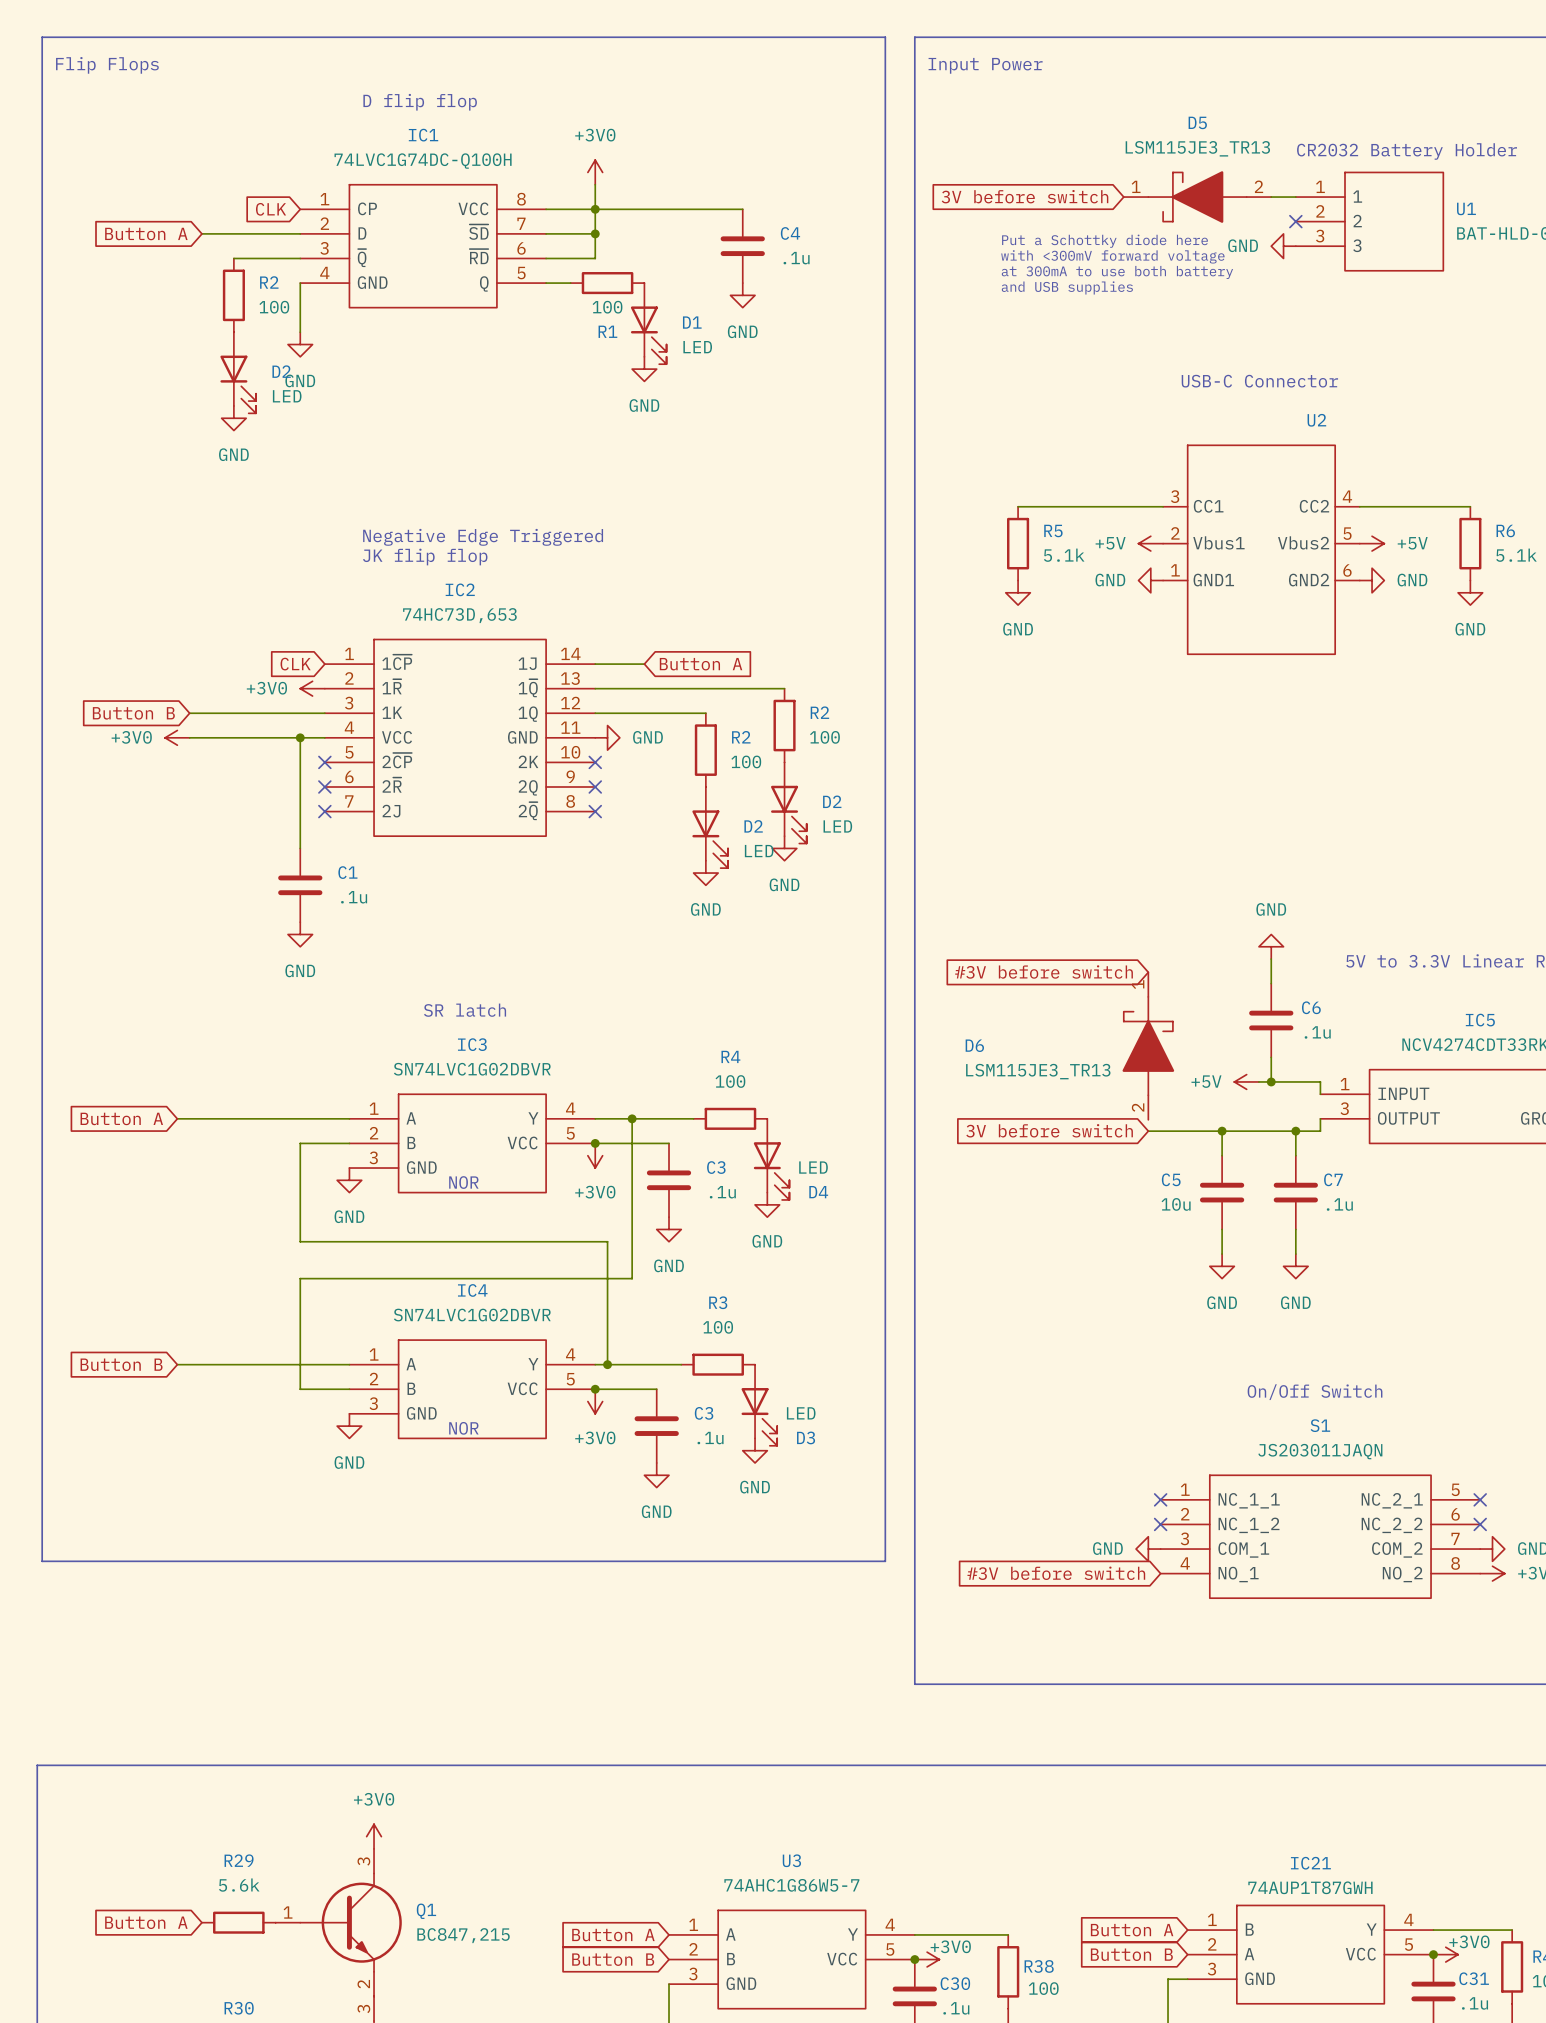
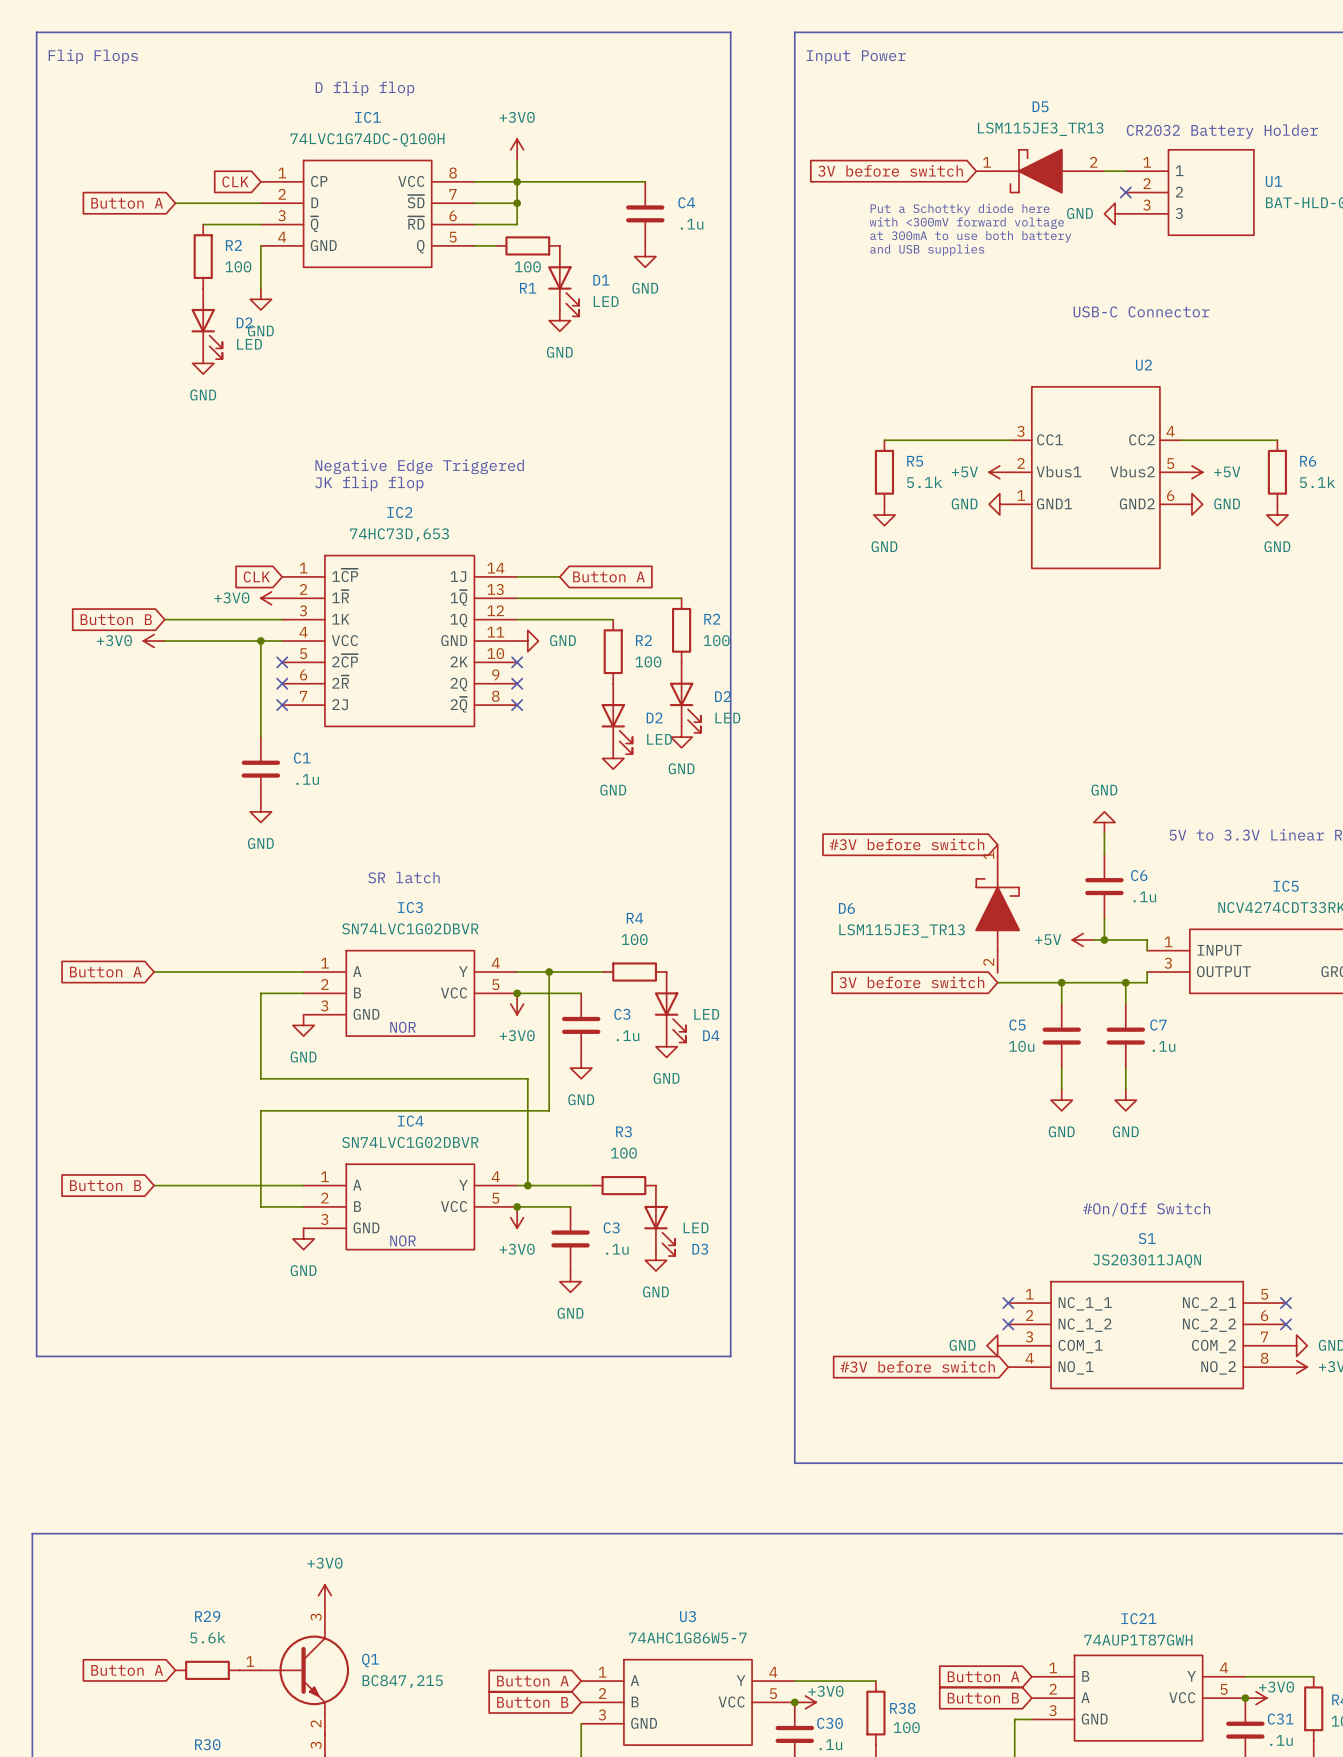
line: (841, 37) (885, 37) (885, 1561) (841, 1561) -> (730, 32) (730, 1356)
text position: USB-C Connector (1259, 381) -> USB-C Connector (1141, 311)
text: On/Off Switch (1315, 1392) -> #On/Off Switch (1146, 1209)

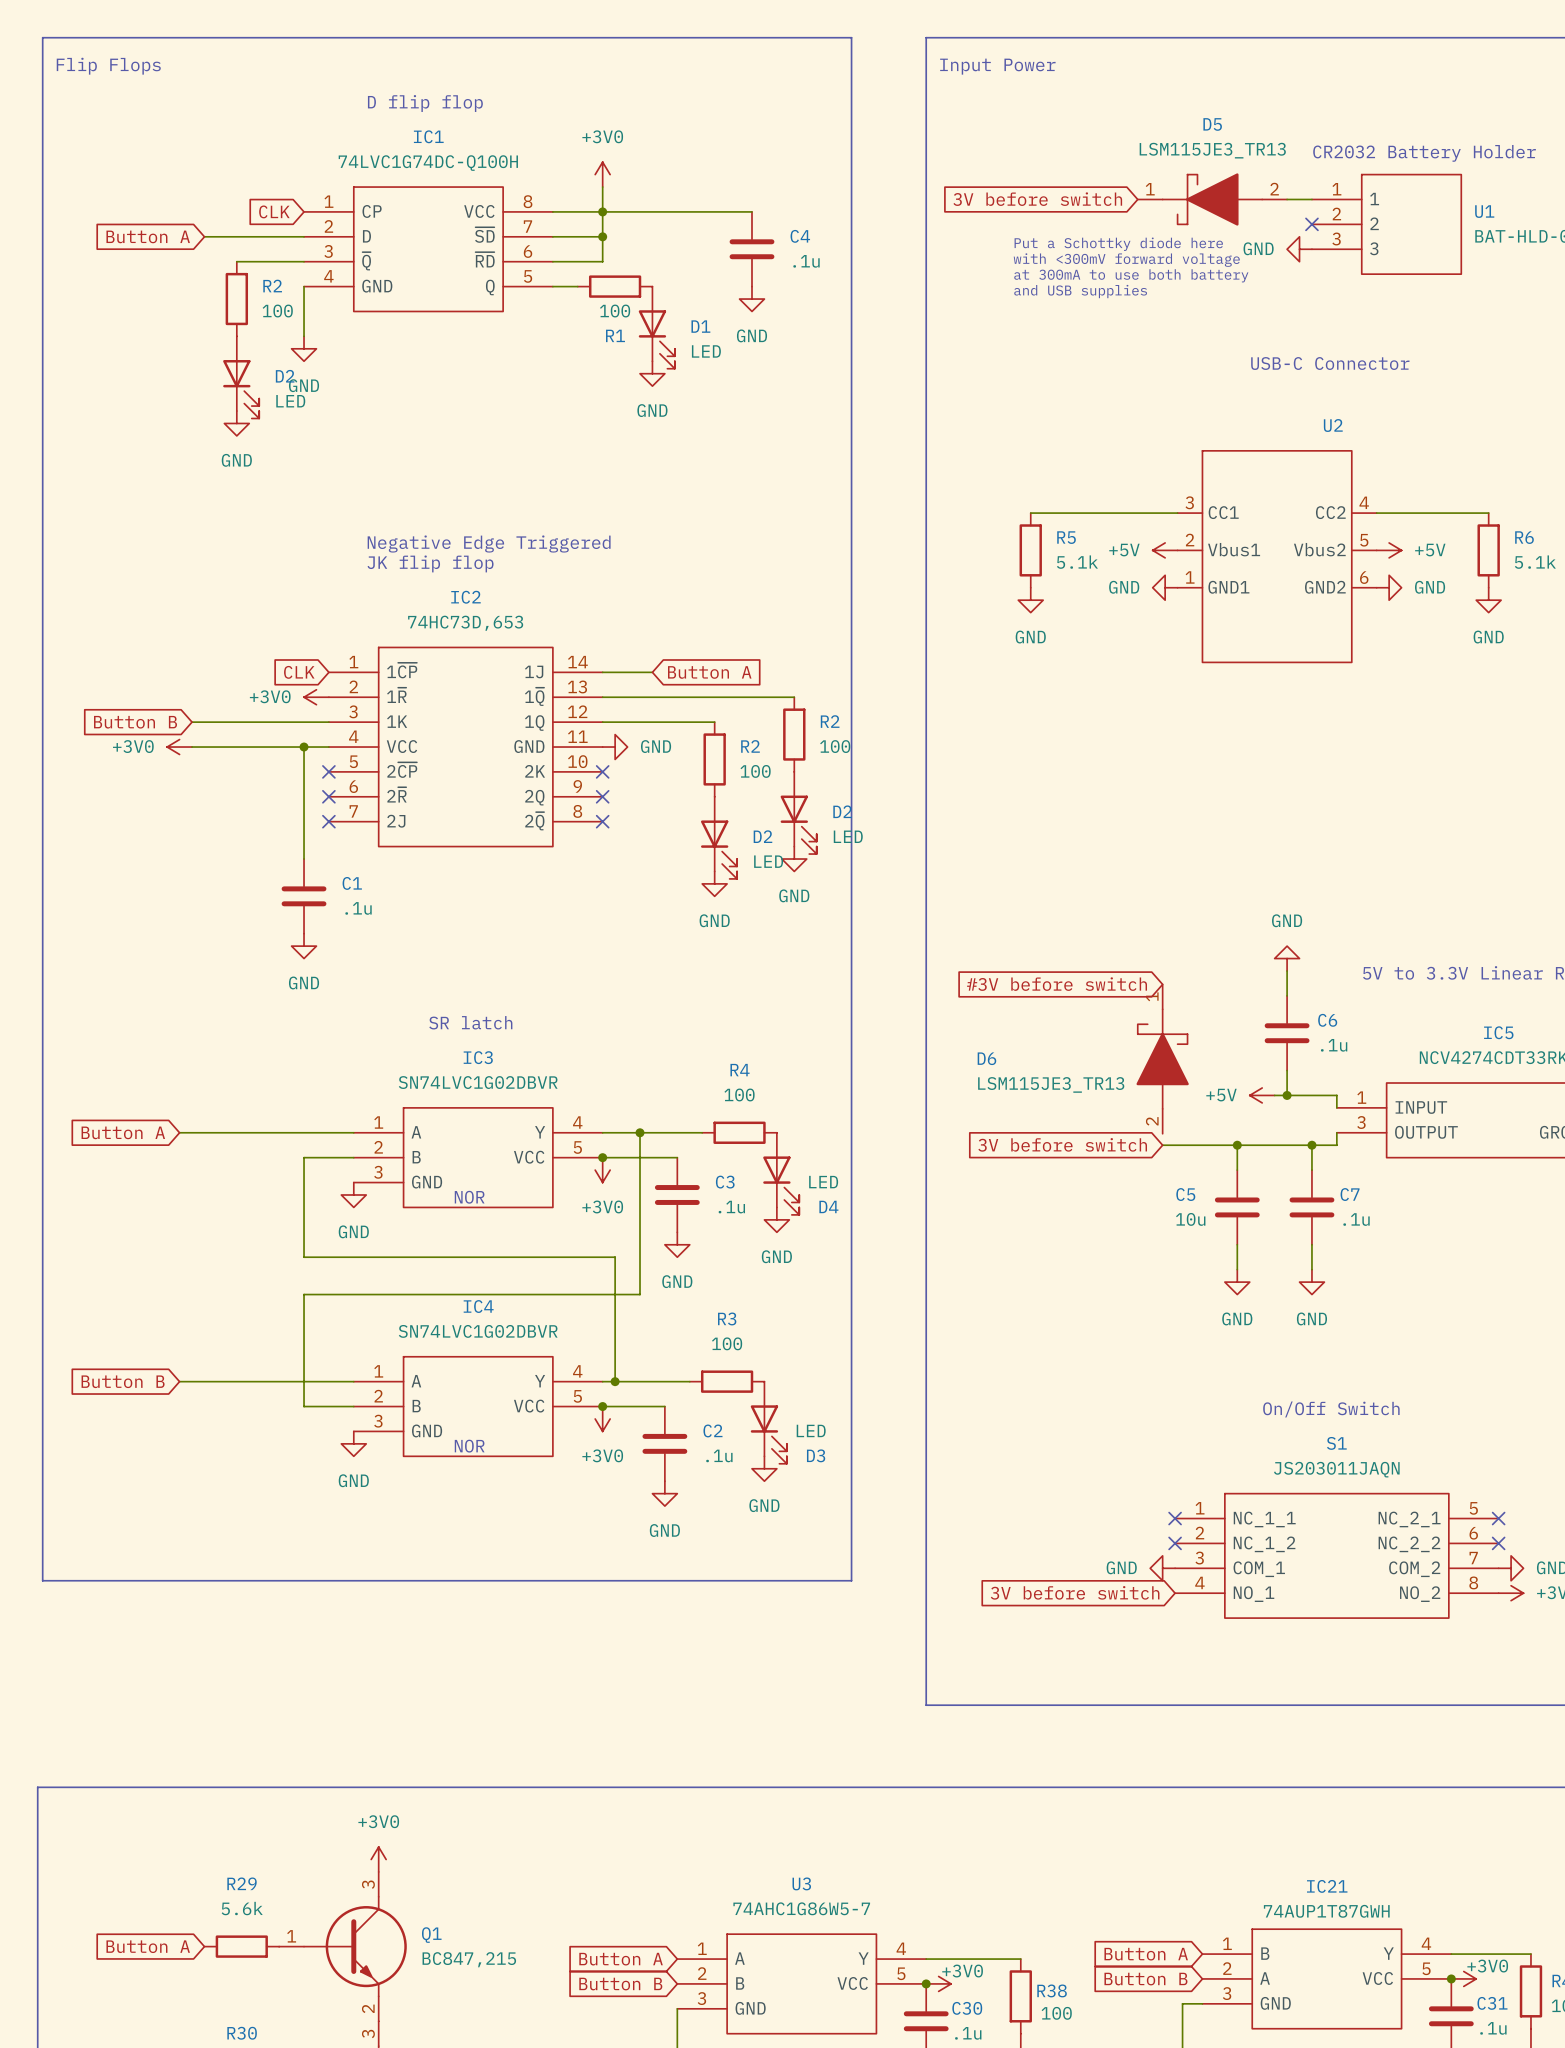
text: #On/Off Switch (1146, 1209) -> On/Off Switch (1331, 1409)
C3 name: C3 (611, 1227) -> C2 (712, 1430)
global label: #3V before switch (917, 1366) -> 3V before switch (1075, 1592)

